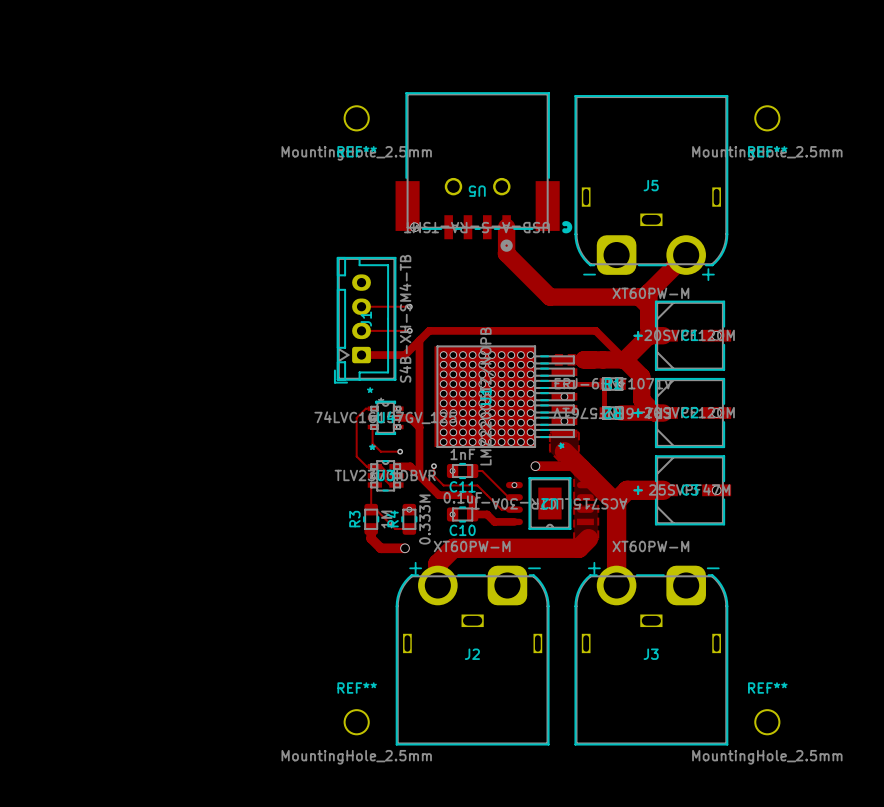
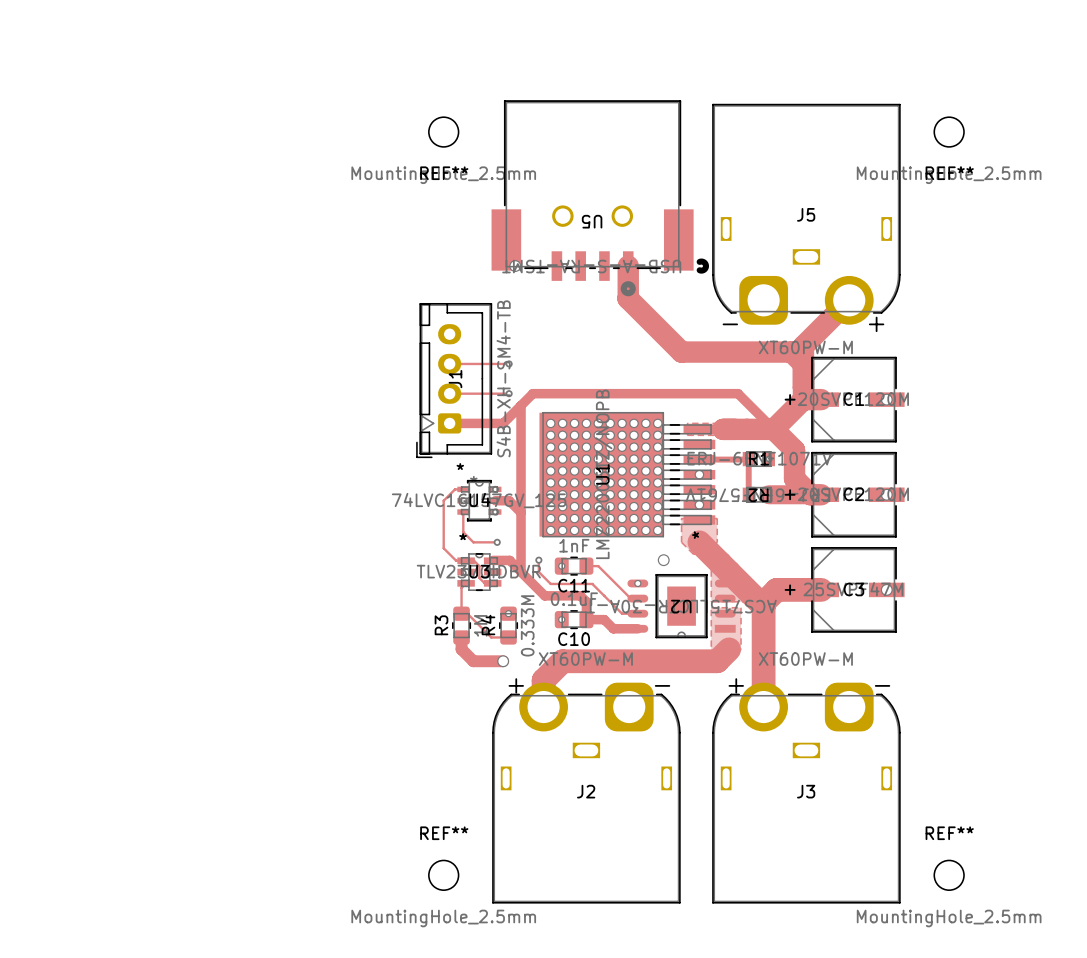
track: (535, 466) (578, 466) (581, 468) -> none

